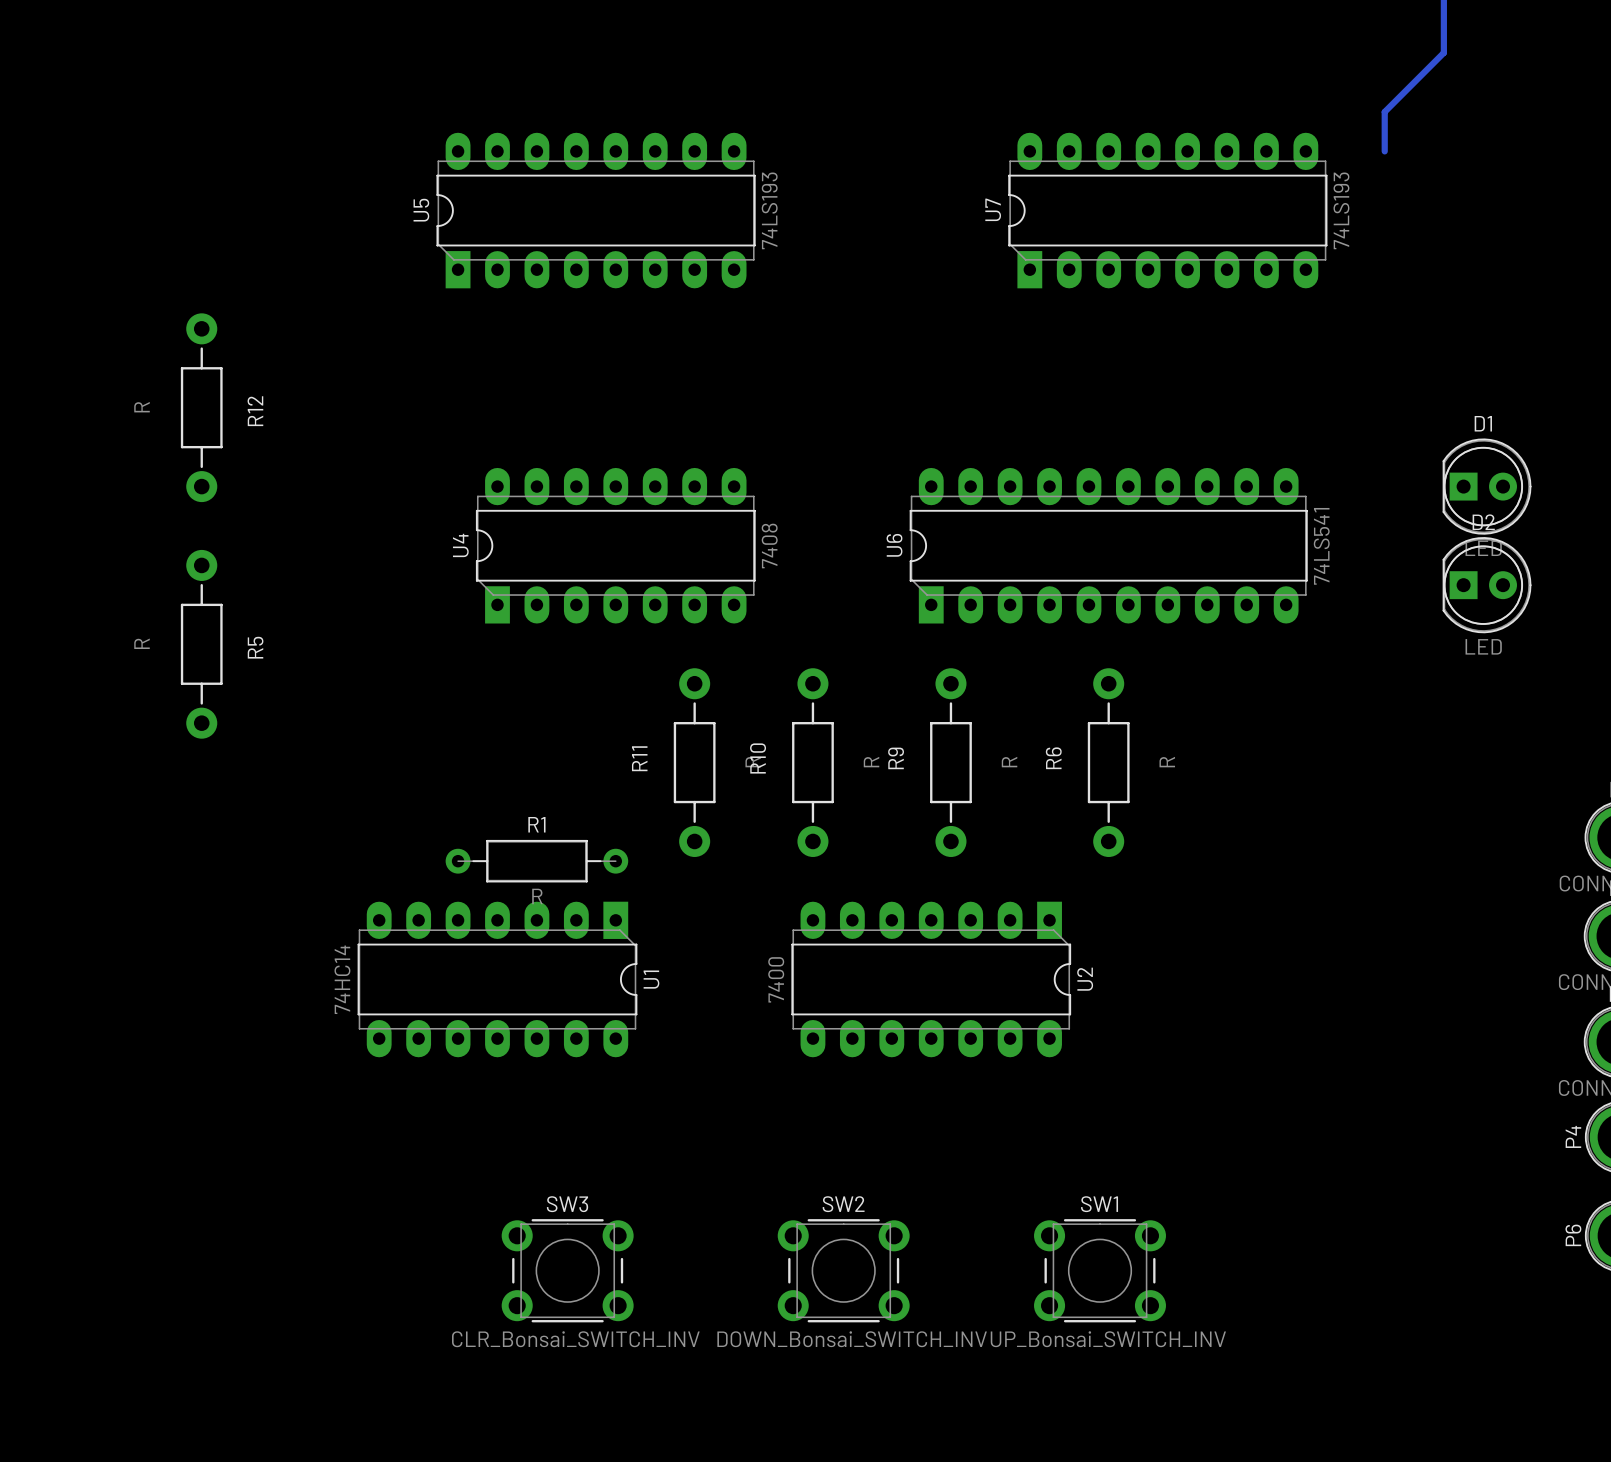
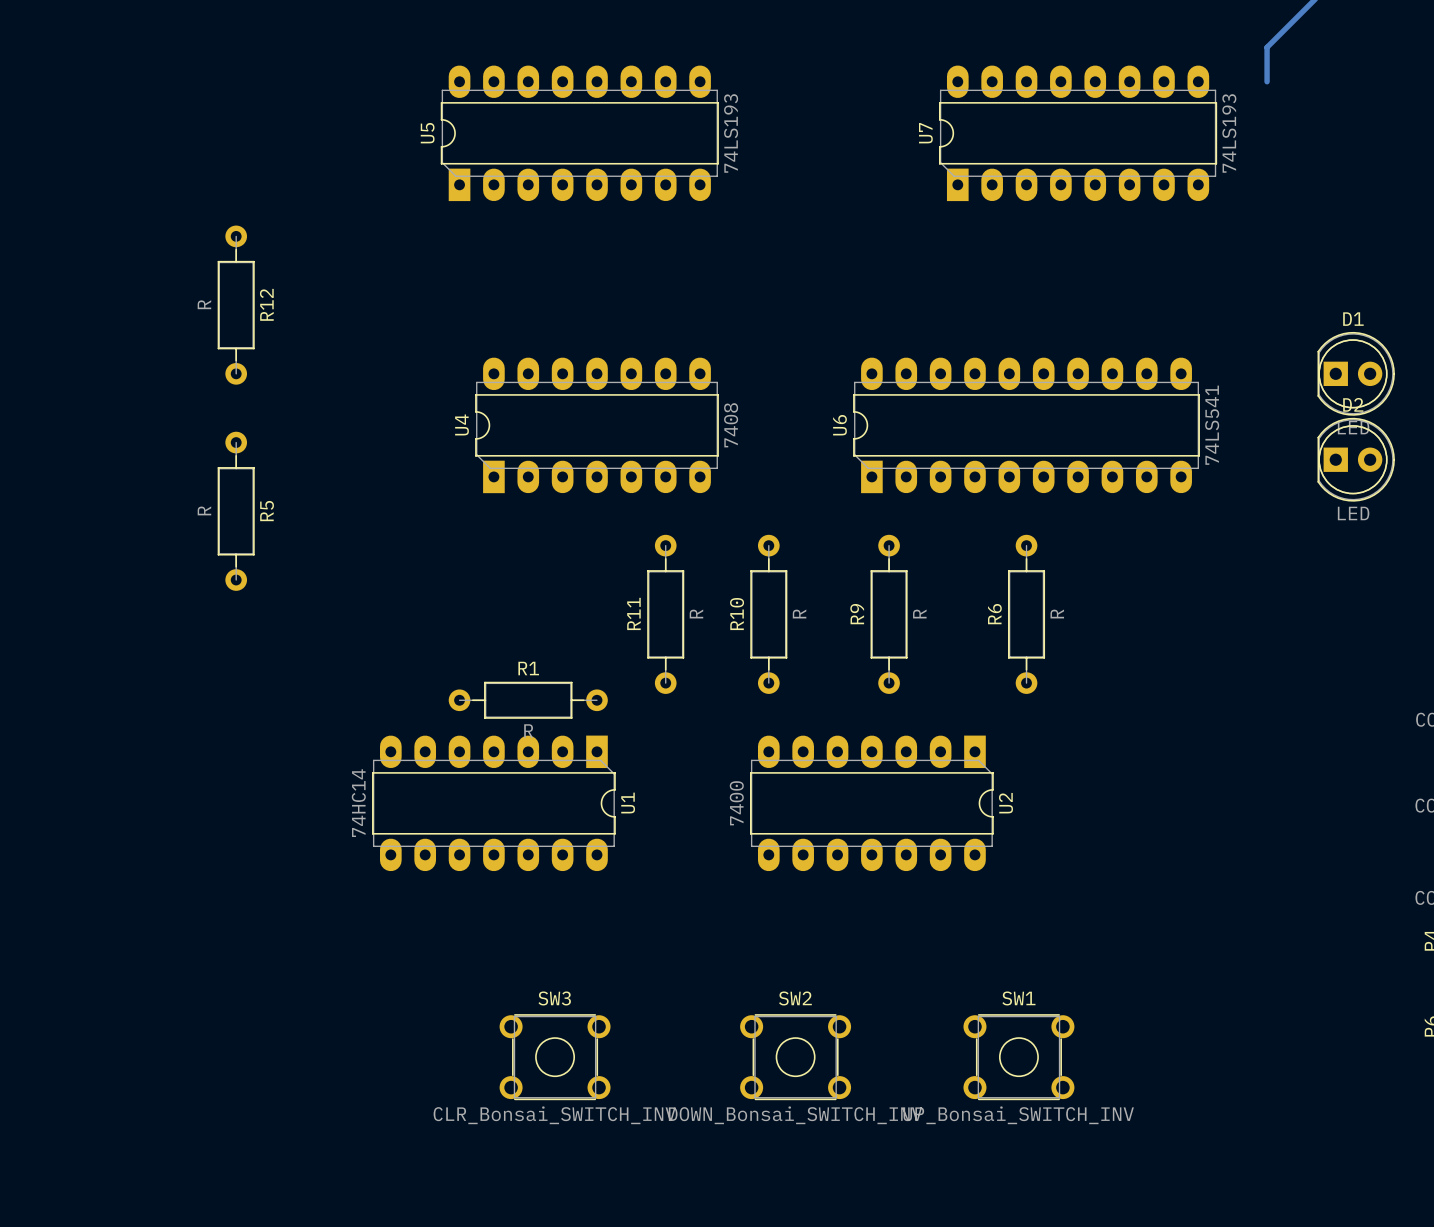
R12 footprint: [180, 313, 223, 503] -> [217, 225, 255, 385]
R5 footprint: [180, 549, 223, 739] -> [217, 431, 255, 591]
R11 footprint: [673, 668, 716, 857] -> [647, 534, 685, 694]
R10 footprint: [792, 668, 834, 857] -> [750, 534, 788, 694]
R9 footprint: [930, 668, 972, 857] -> [870, 534, 908, 694]
R6 footprint: [1087, 668, 1130, 857] -> [1007, 534, 1046, 694]
SW3 footprint: [501, 1219, 634, 1323] -> [499, 1014, 611, 1101]
SW2 footprint: [777, 1219, 910, 1323] -> [740, 1014, 852, 1101]
SW1 footprint: [1034, 1219, 1166, 1323] -> [963, 1014, 1075, 1101]

